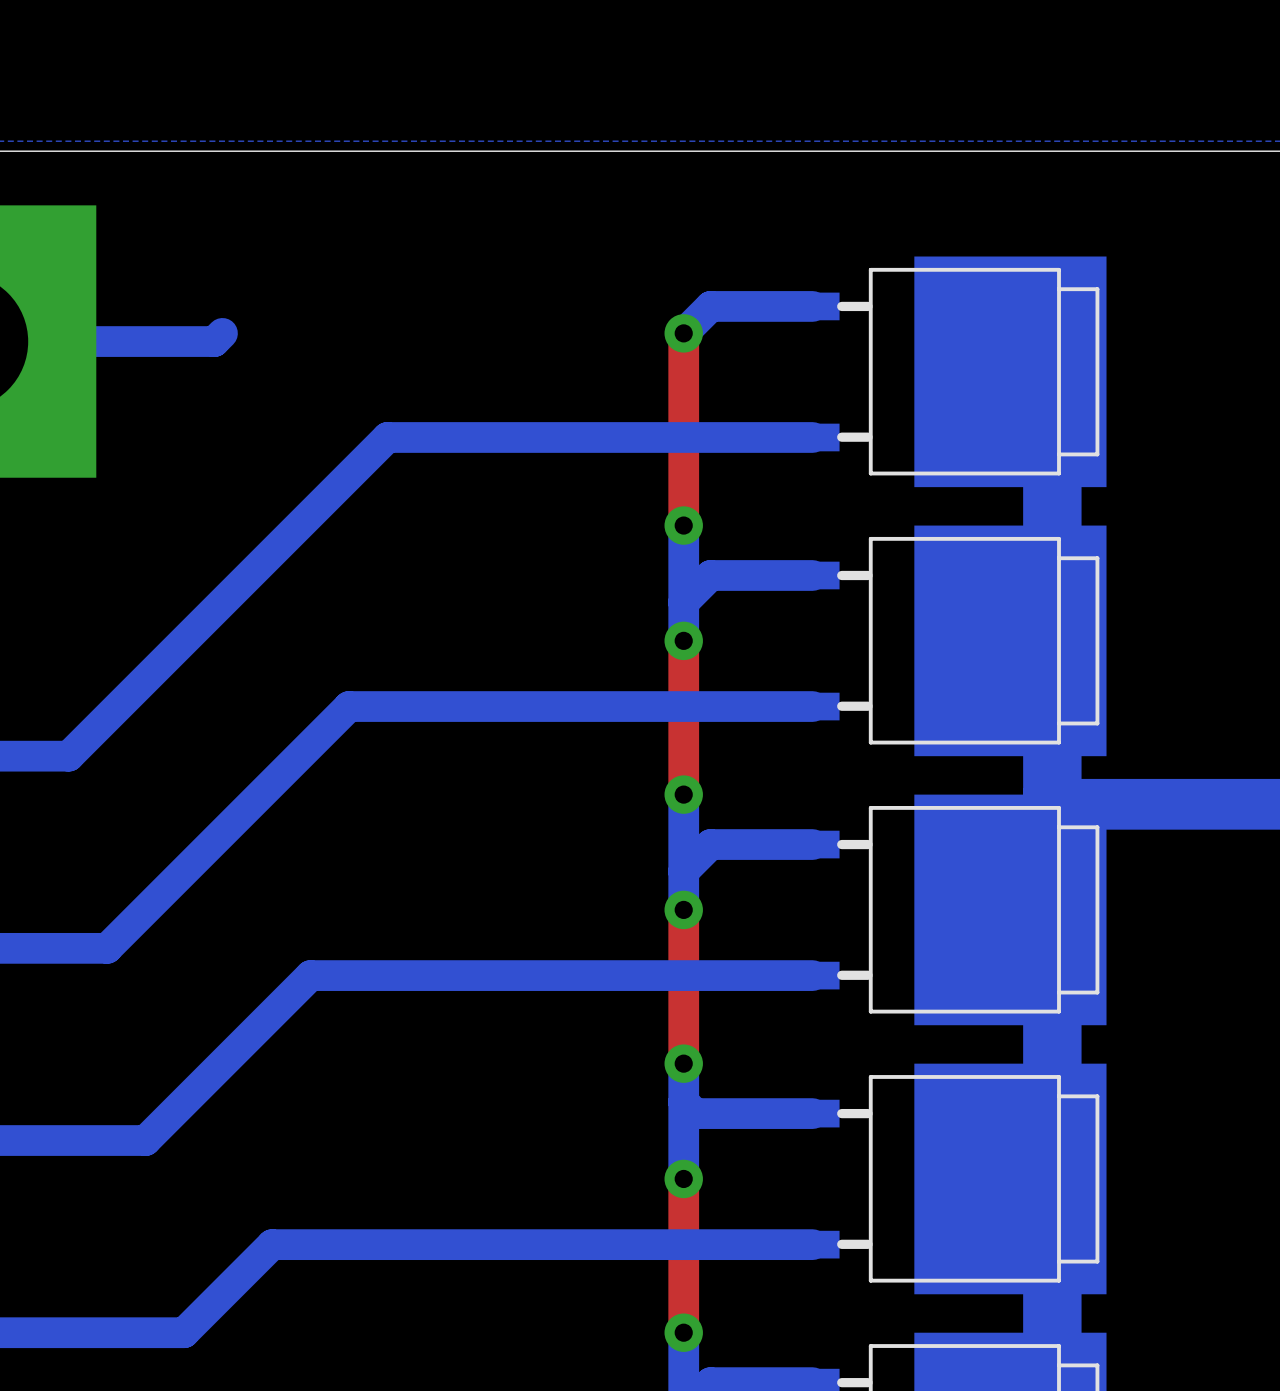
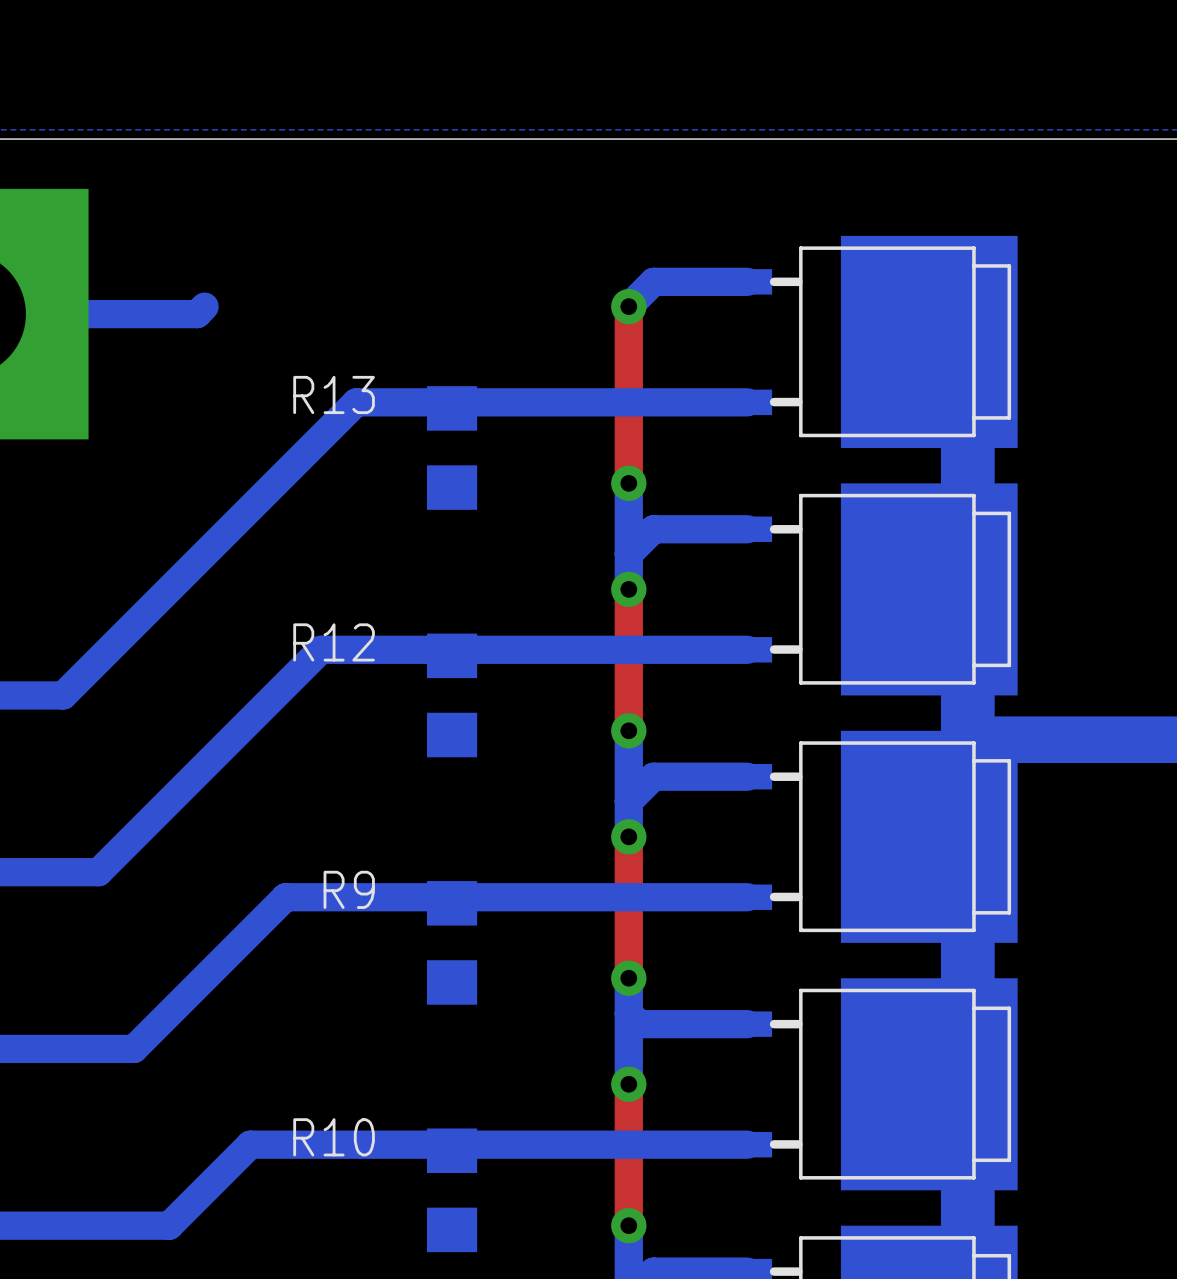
R13: none -> (452, 448)
R12: none -> (452, 695)
R9: none -> (452, 942)
R10: none -> (452, 1190)

